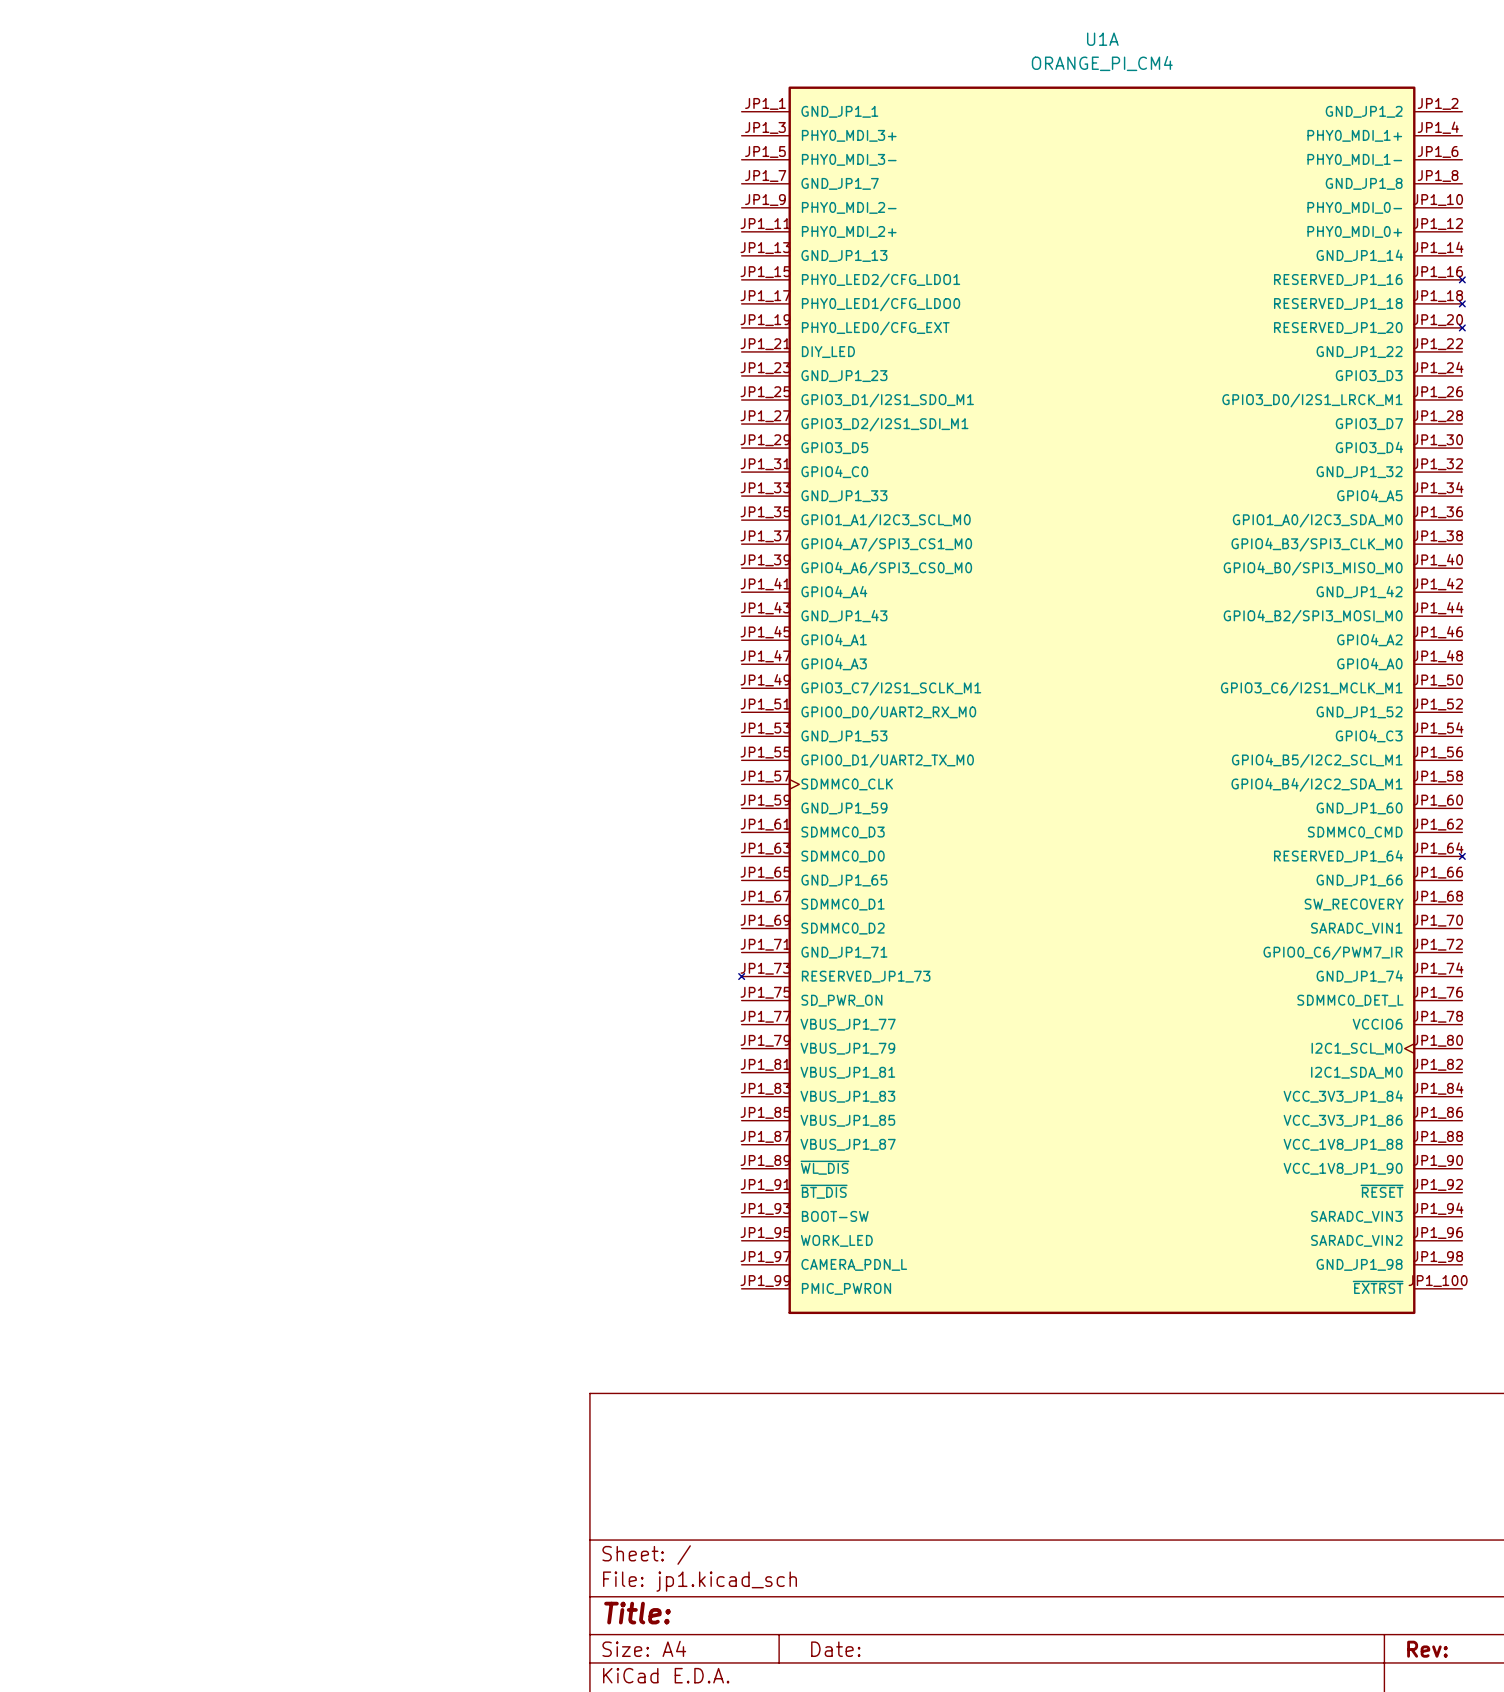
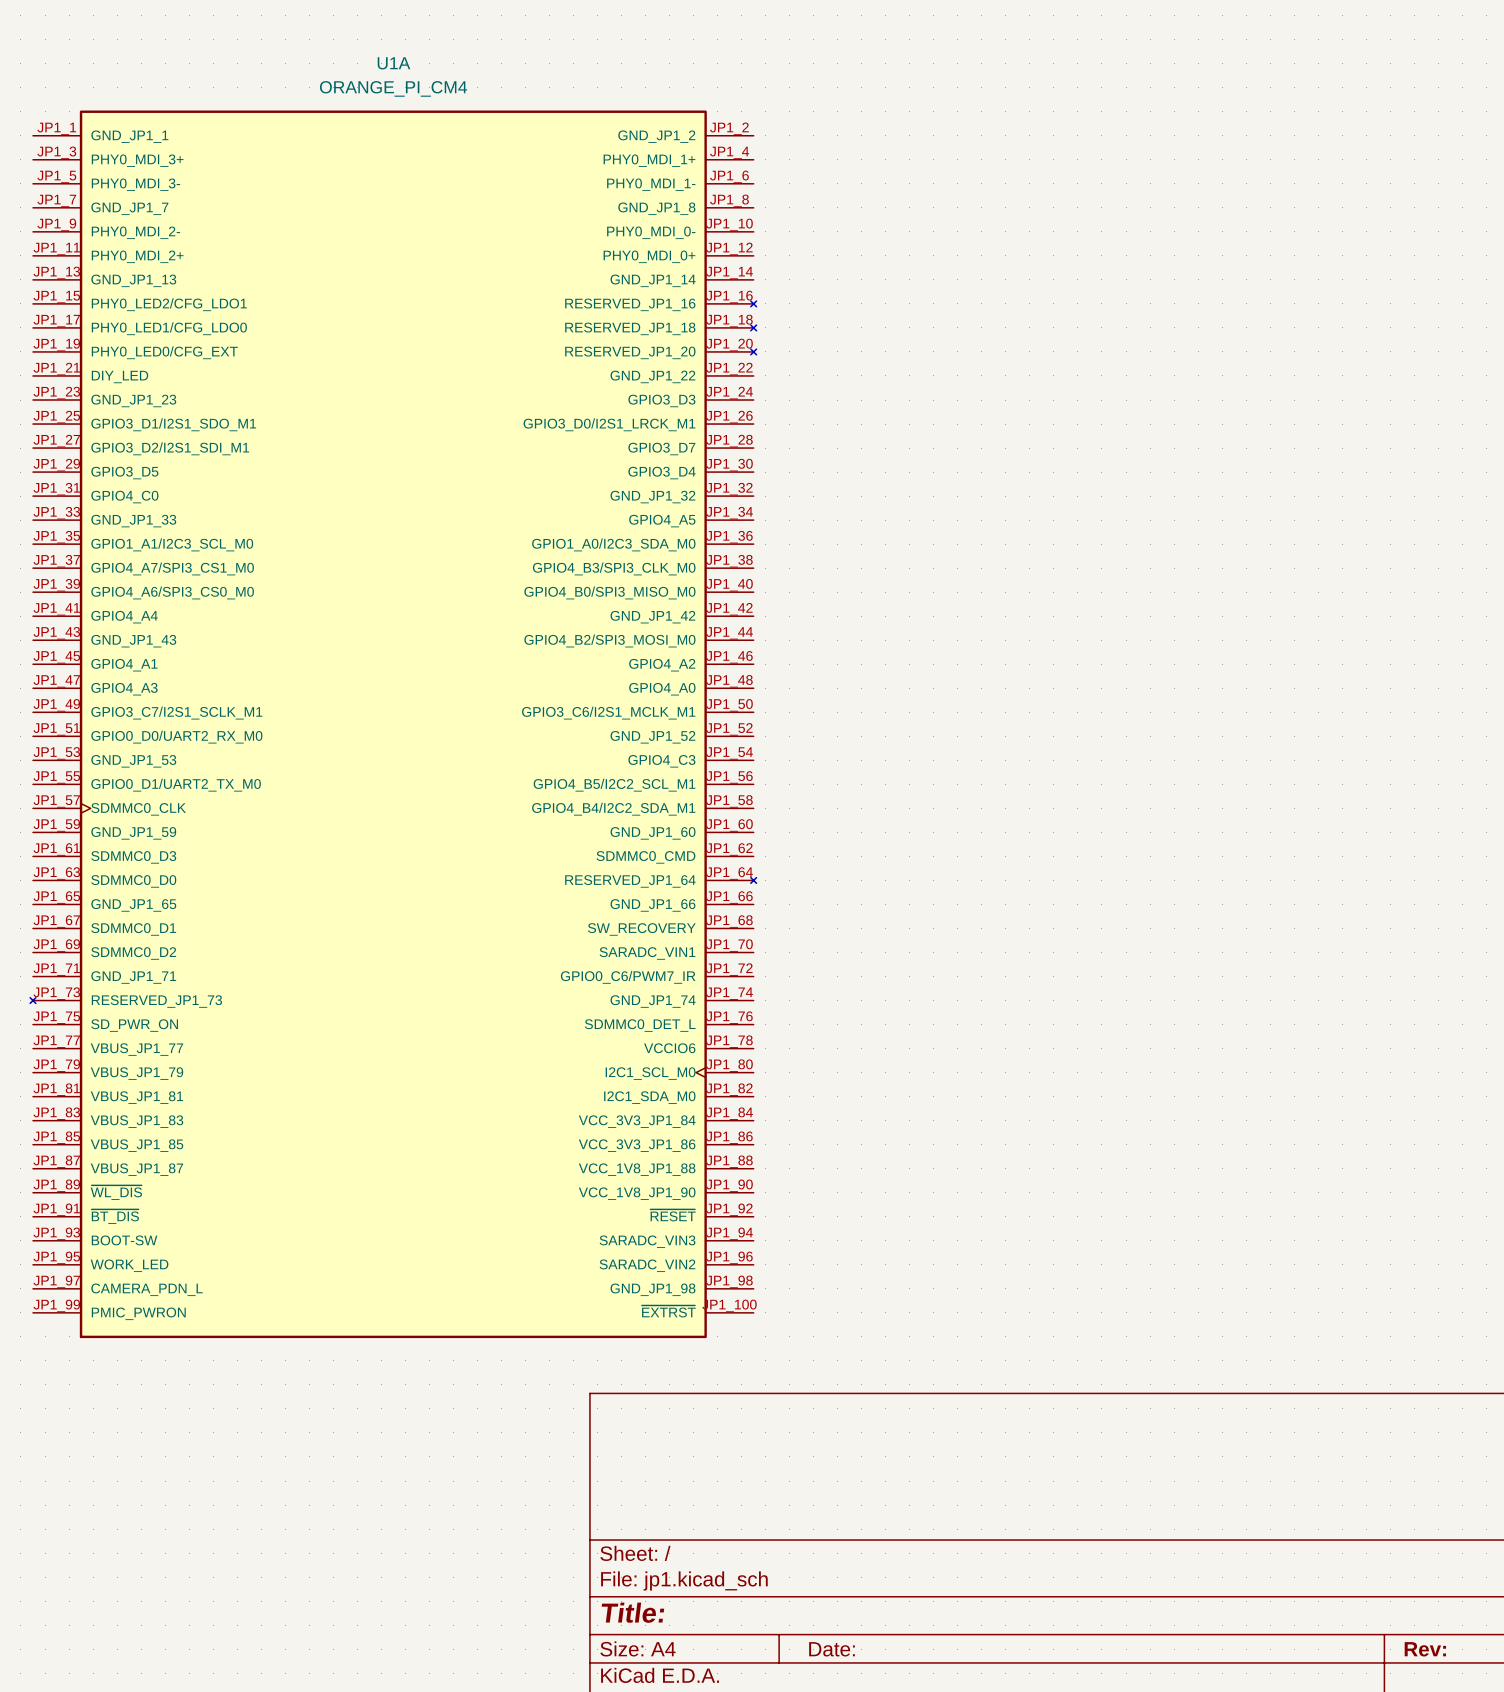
U1A position: (1101, 700) -> (393, 724)

